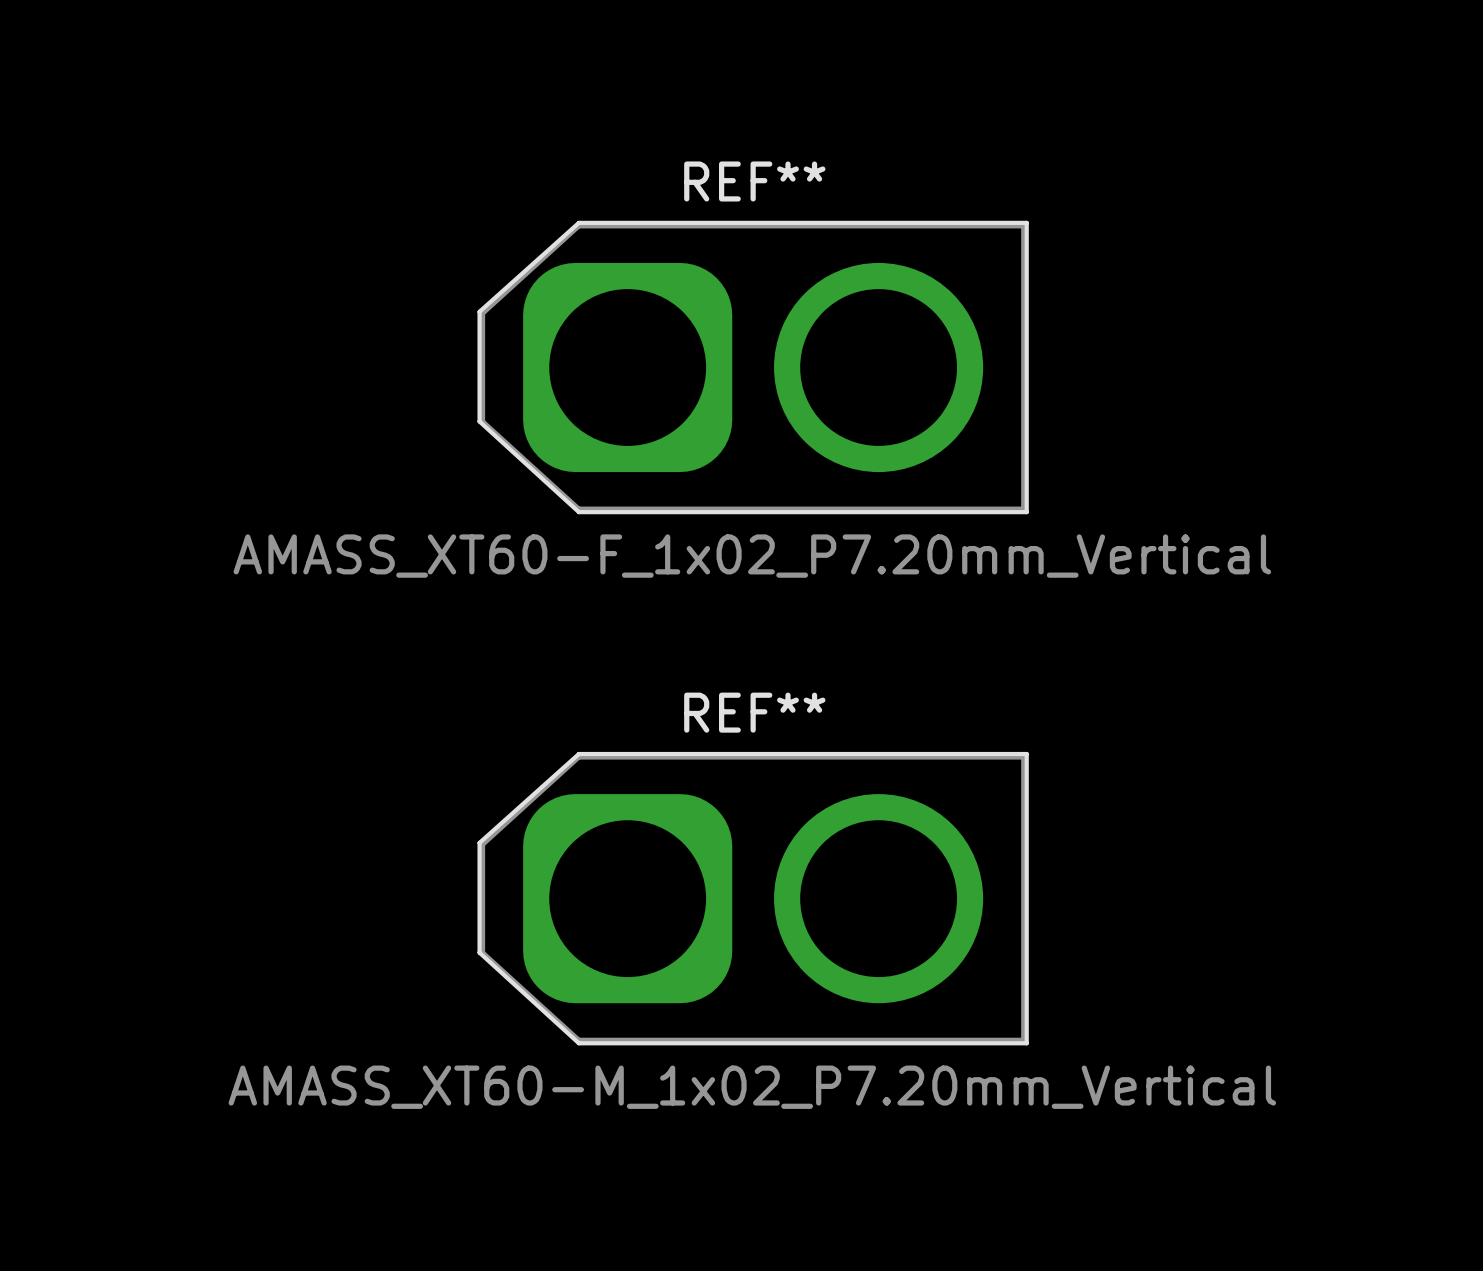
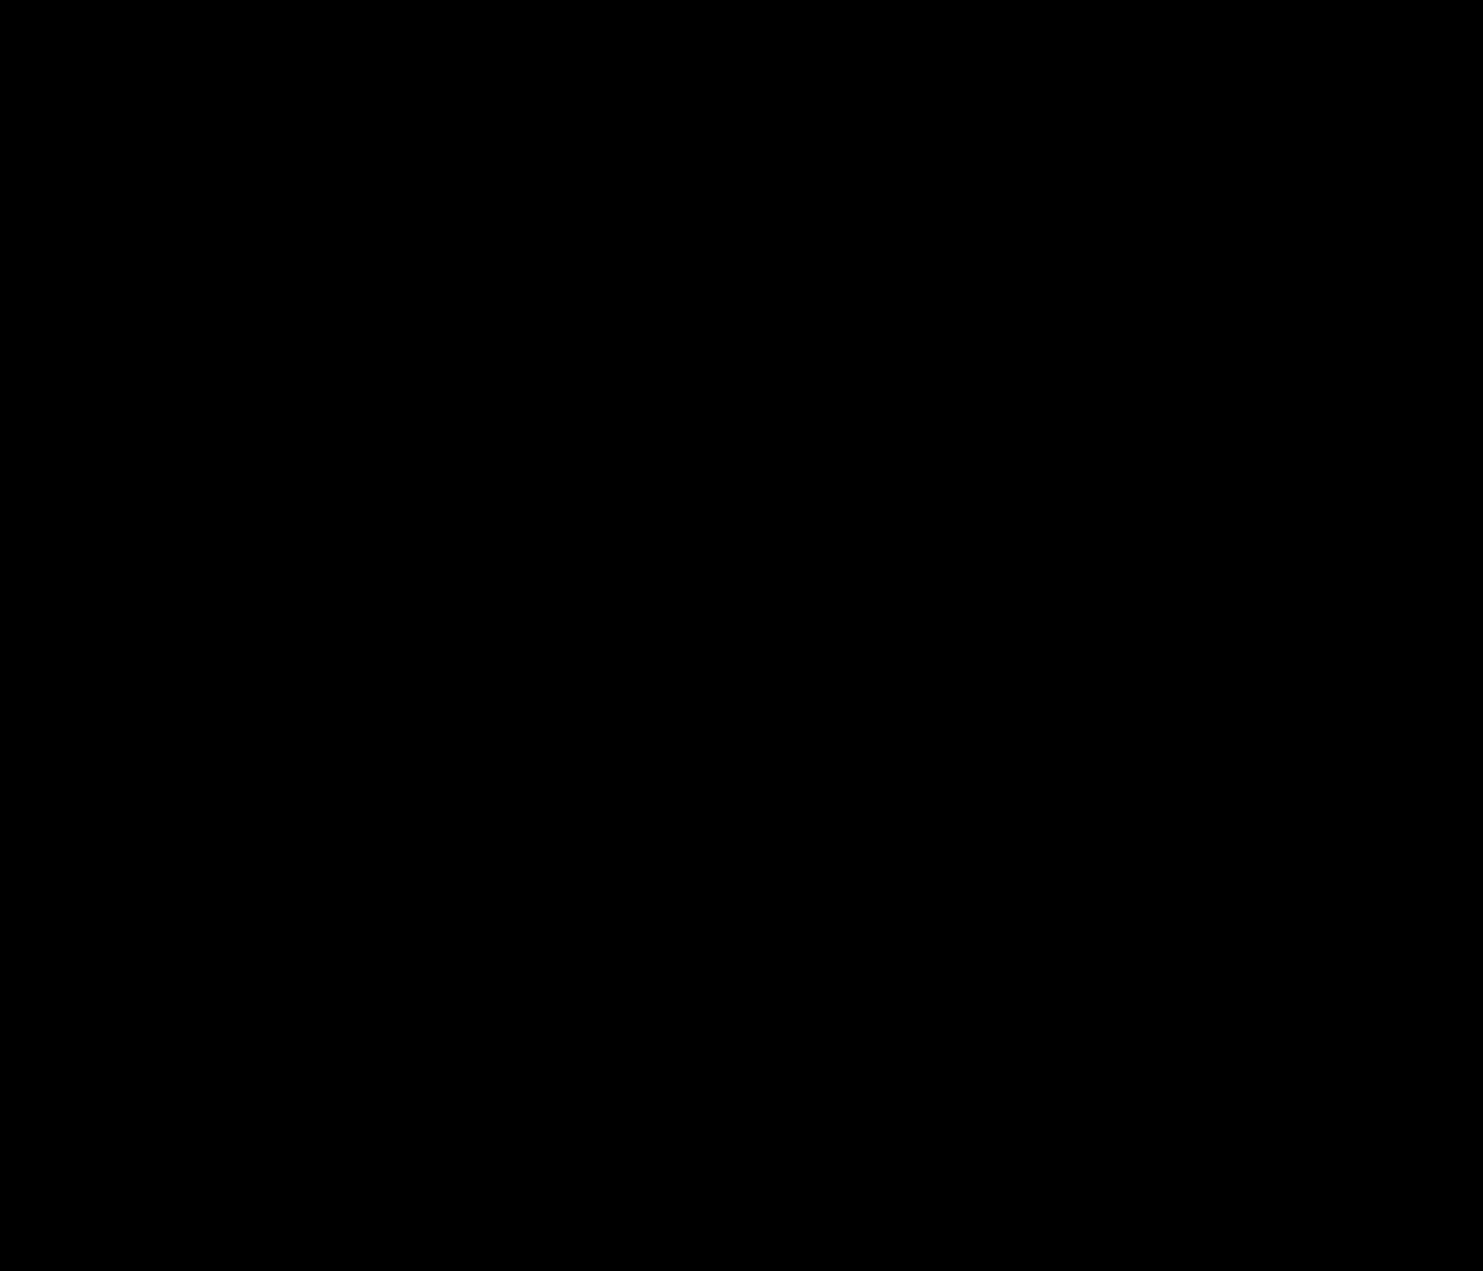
REF**: AMASS_XT60-F_1x02_P7.20mm_Vertical (753, 367) -> none
REF**: AMASS_XT60-M_1x02_P7.20mm_Vertical (753, 898) -> none

